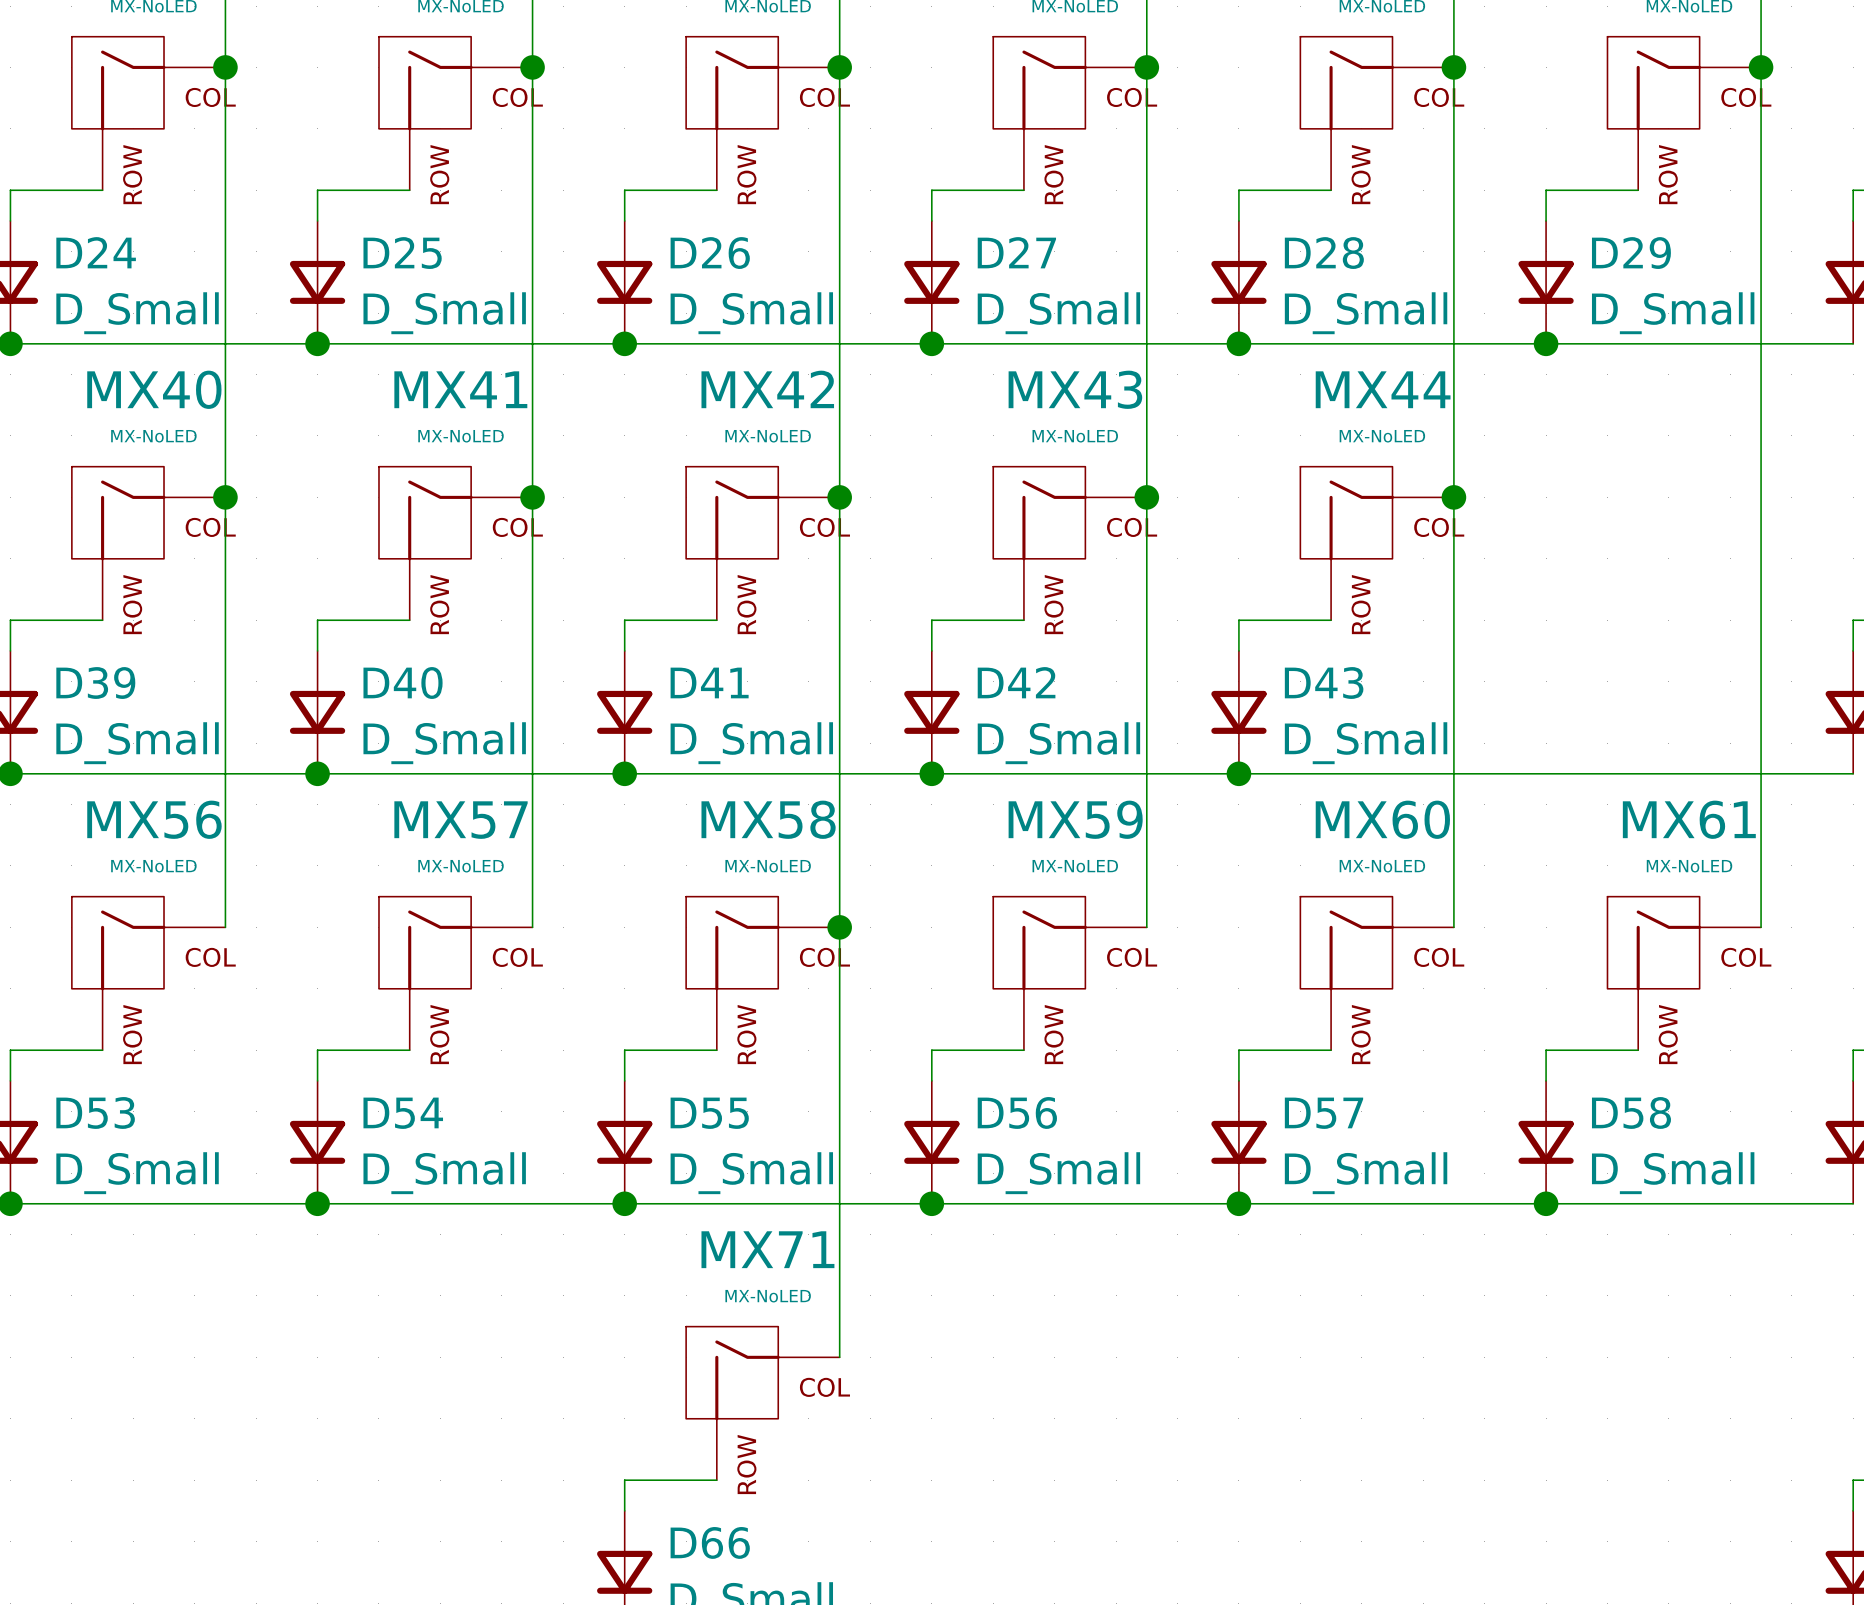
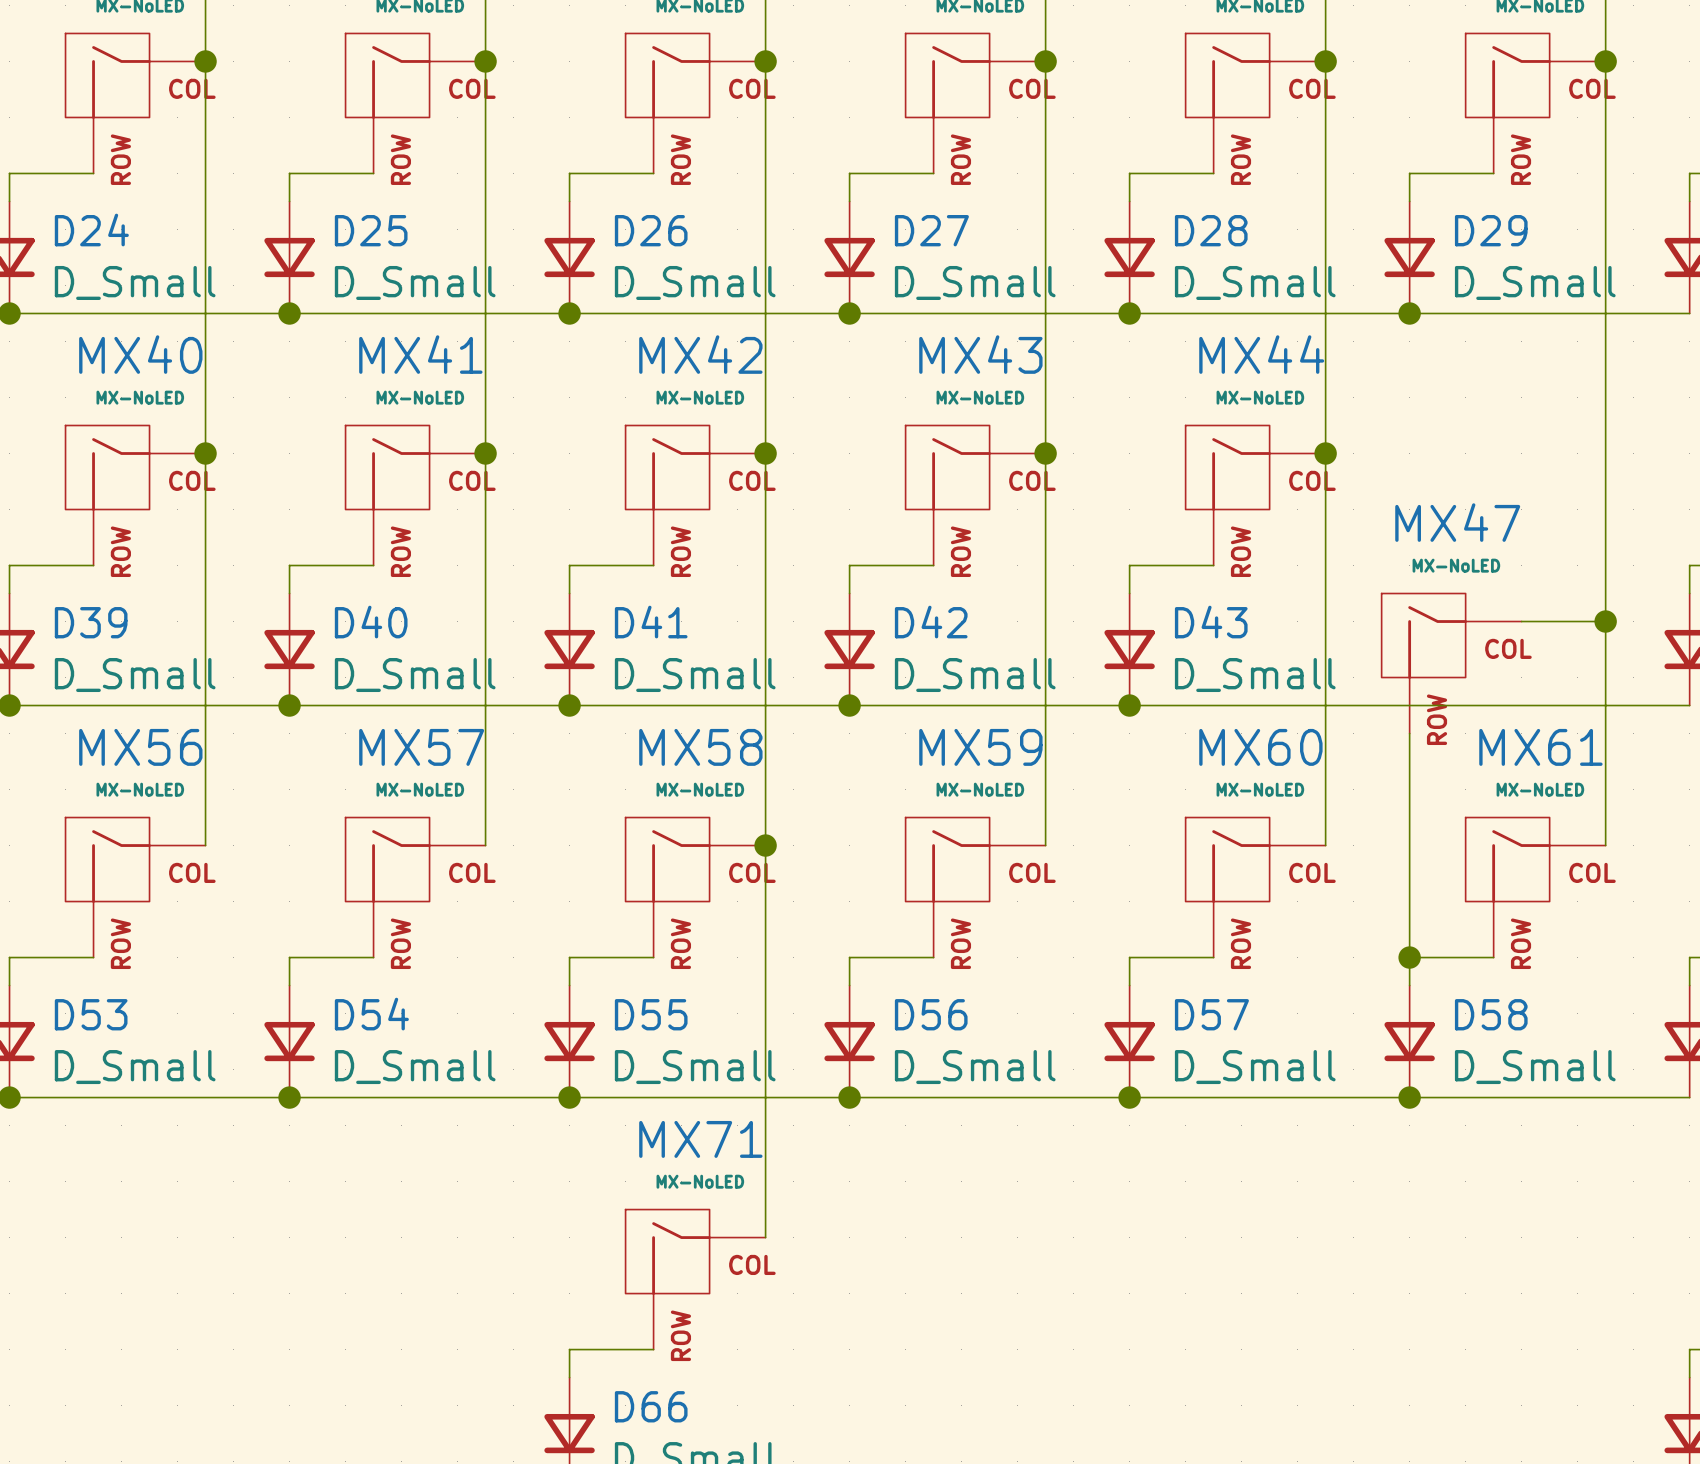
wire: none -> (1521, 621) (1605, 621)
junction: none -> (1605, 621)
MX47: none -> MX-NoLED (1451, 663)
wire: none -> (1409, 733) (1409, 957)
junction: none -> (1409, 957)

